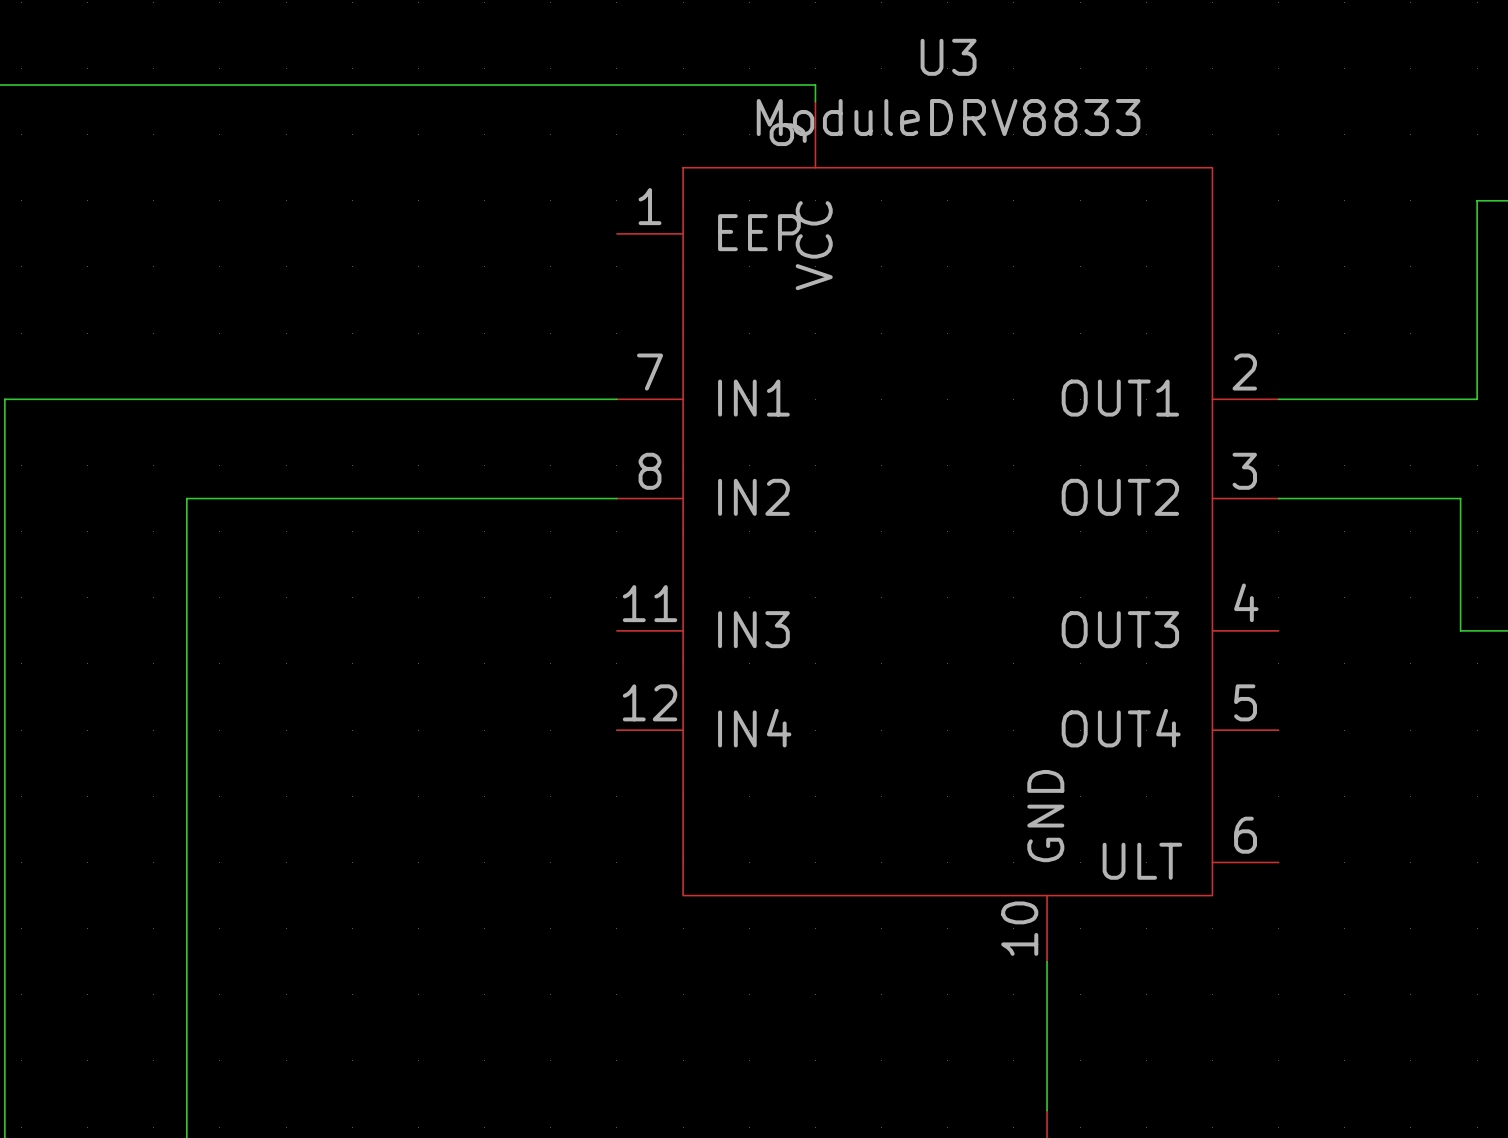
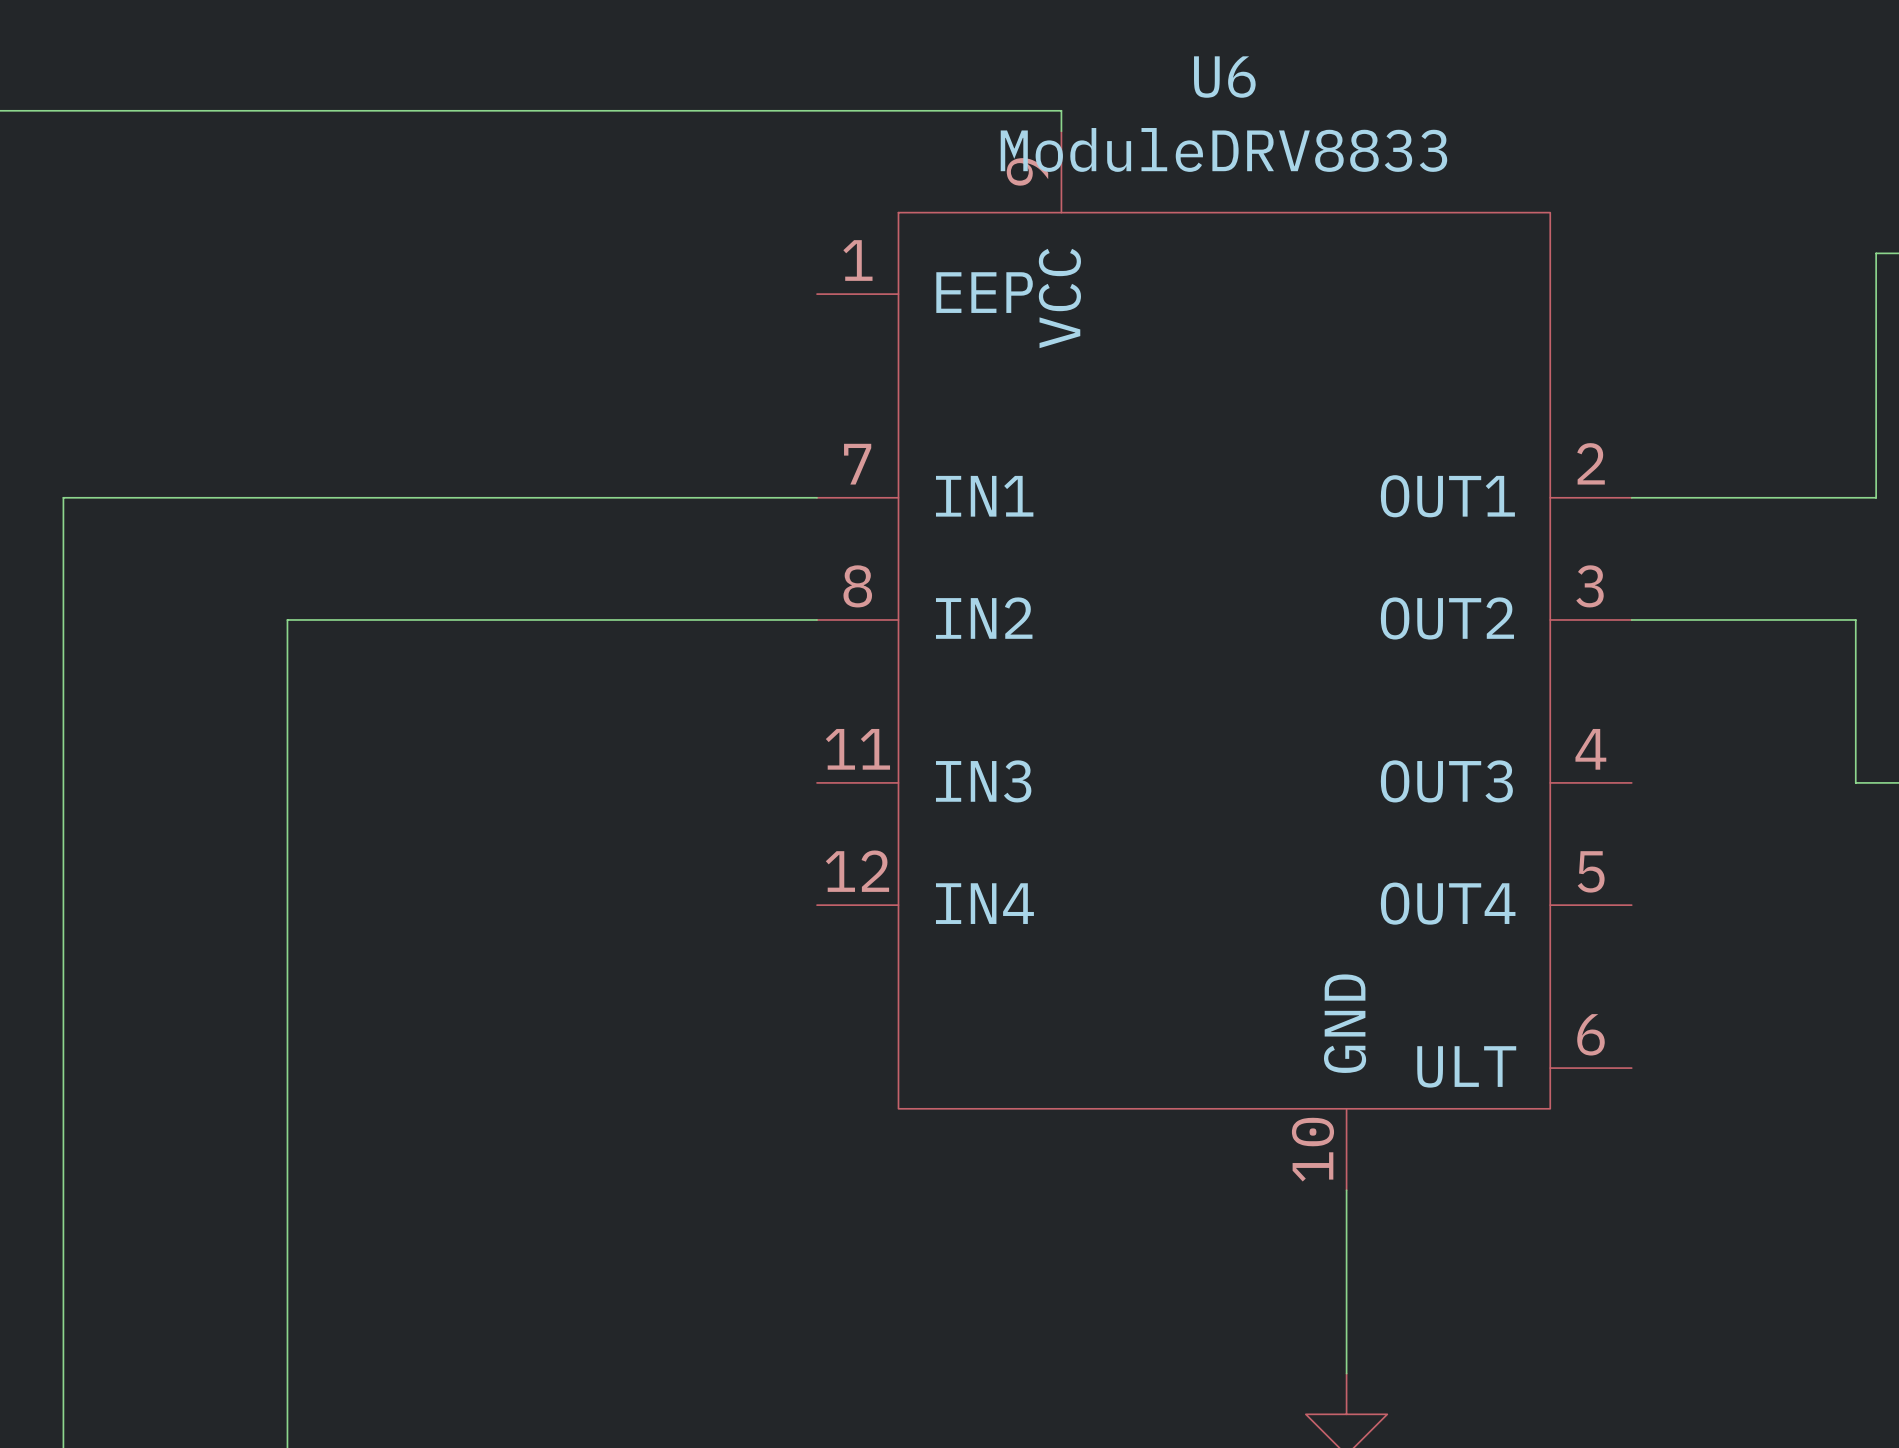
U3 name: U3 (948, 57) -> U6 (1224, 77)

